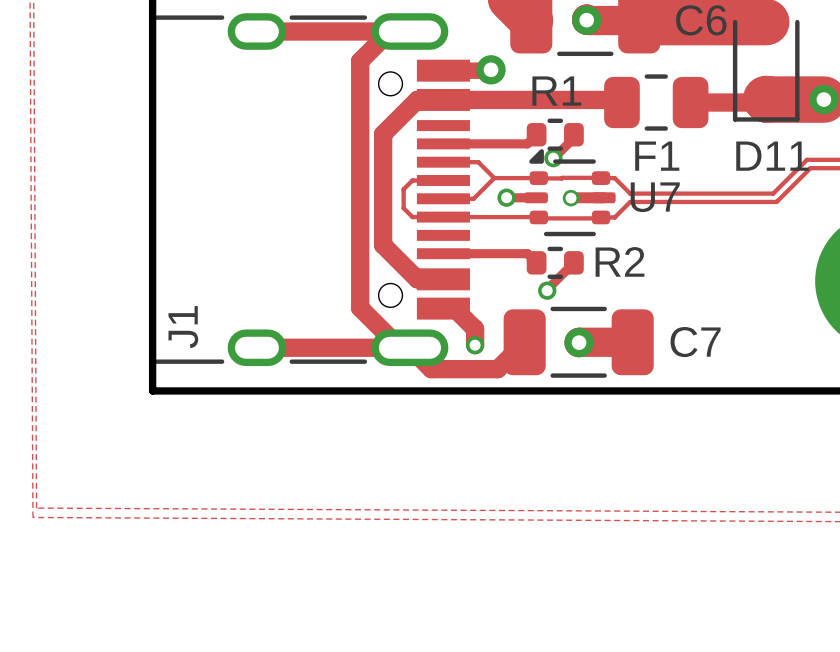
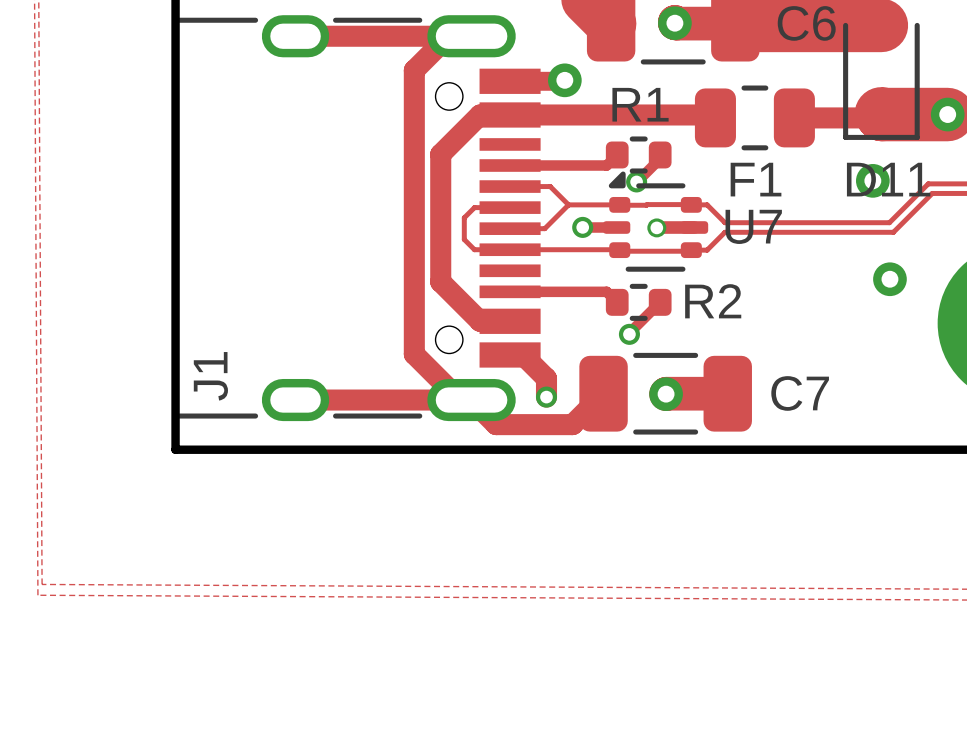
via: none -> (872, 180)
via: none -> (889, 279)

